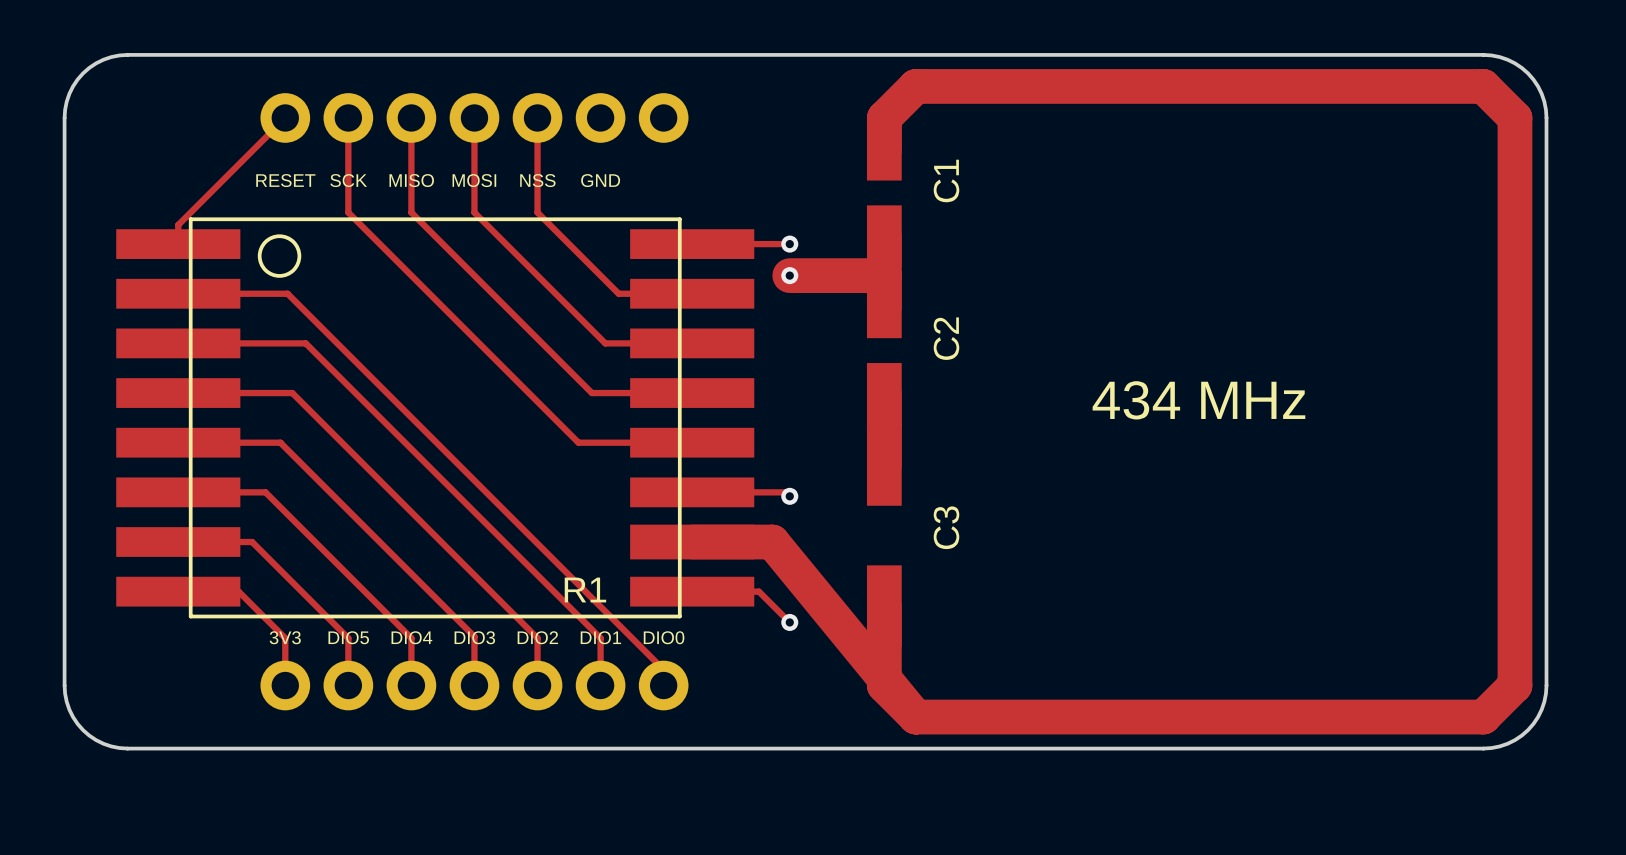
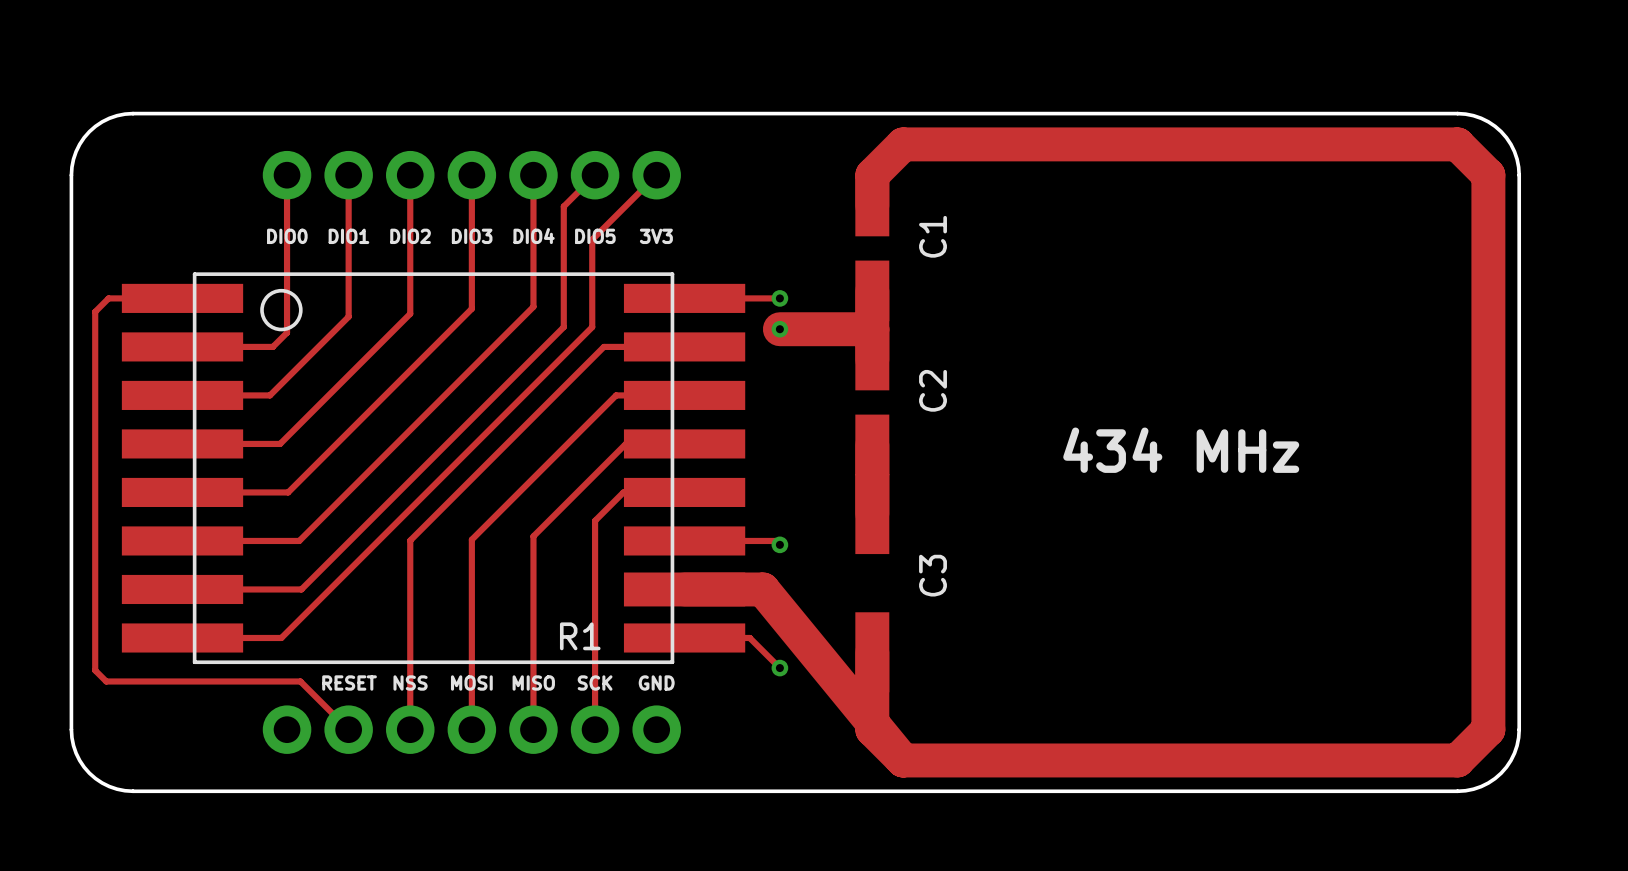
track: (285, 117) (178, 224) (178, 244) -> (287, 175) (287, 332) (272, 346)
track: none -> (595, 175) (563, 206) (563, 327) (301, 589) (254, 589)
text: RESET (285, 180) -> DIO0 (287, 236)
text: SCK (348, 180) -> DIO1 (348, 236)
text: MISO (411, 180) -> DIO2 (410, 236)
text: MOSI (474, 180) -> DIO3 (472, 236)
text: NSS (537, 180) -> DIO4 (534, 236)
text: GND (600, 180) -> DIO5 (595, 236)
track: (348, 212) (578, 442) (629, 442) -> (348, 267) (348, 316) (269, 395)
track: (411, 212) (591, 393) (632, 393) -> (410, 267) (410, 313) (280, 443)
track: (474, 212) (605, 343) (622, 343) -> (471, 267) (471, 308) (288, 492) (282, 492)
track: (537, 212) (618, 293) -> (533, 267) (533, 306) (299, 540) (267, 540)
track: (270, 293) (287, 293) (663, 669) (663, 685) -> none
track: (267, 343) (305, 343) (600, 638) -> (623, 492) (595, 520) (595, 683)
track: (278, 393) (292, 393) (537, 638) -> (625, 443) (533, 536) (533, 683)
track: (280, 442) (474, 636) -> (616, 395) (471, 539) (471, 682)
track: (265, 492) (411, 638) -> (612, 346) (603, 346) (410, 540) (410, 683)
track: (252, 542) (348, 638) (348, 685) -> (182, 298) (108, 298) (95, 311) (95, 670) (106, 681) (300, 681) (348, 729)
track: (238, 591) (285, 638) (285, 685) -> (241, 637) (281, 637) (592, 327) (592, 239) (656, 175)
text position: 3V3 (285, 637) -> 3V3 (656, 236)
text: DIO5 (348, 637) -> RESET (349, 683)
text: DIO4 (411, 637) -> NSS (410, 683)
text: DIO3 (474, 637) -> MOSI (471, 683)
text: DIO2 (537, 637) -> MISO (533, 683)
text: DIO1 (600, 637) -> SCK (595, 683)
text: DIO0 (664, 637) -> GND (656, 683)

